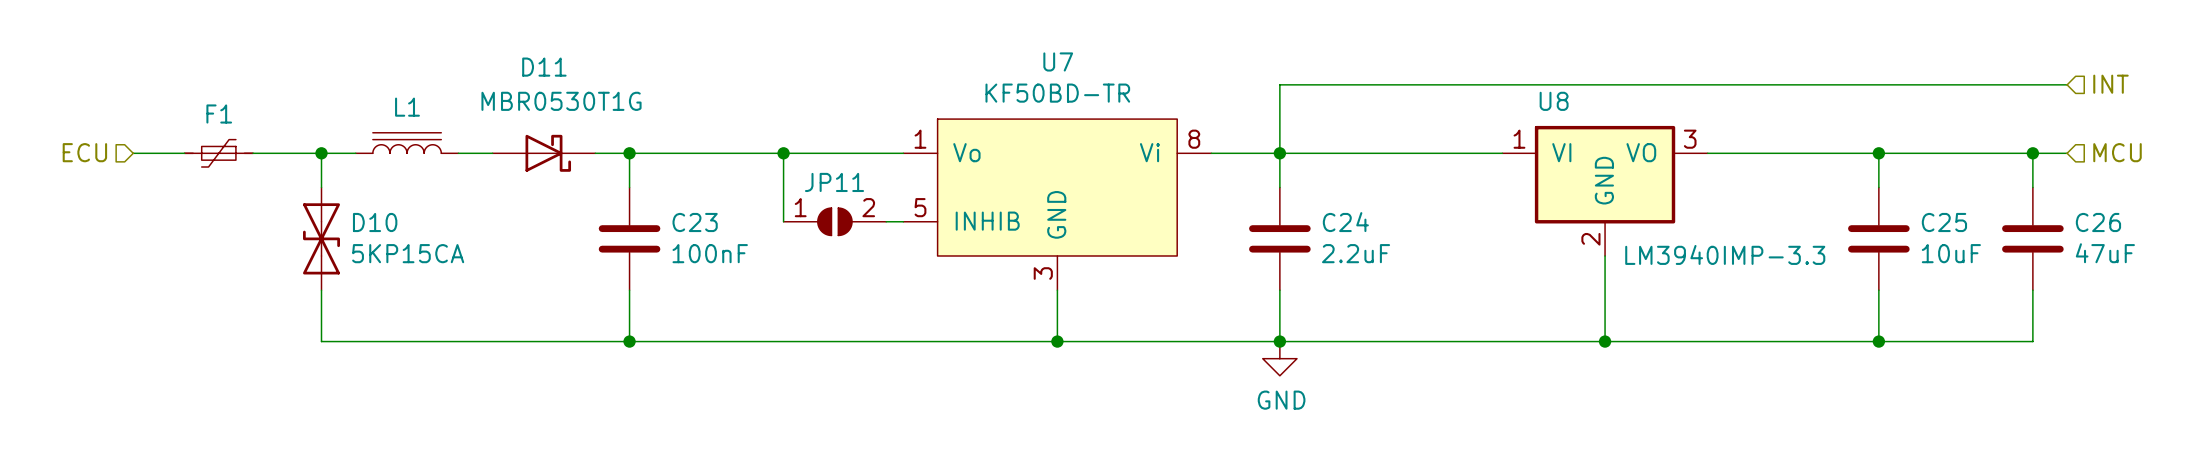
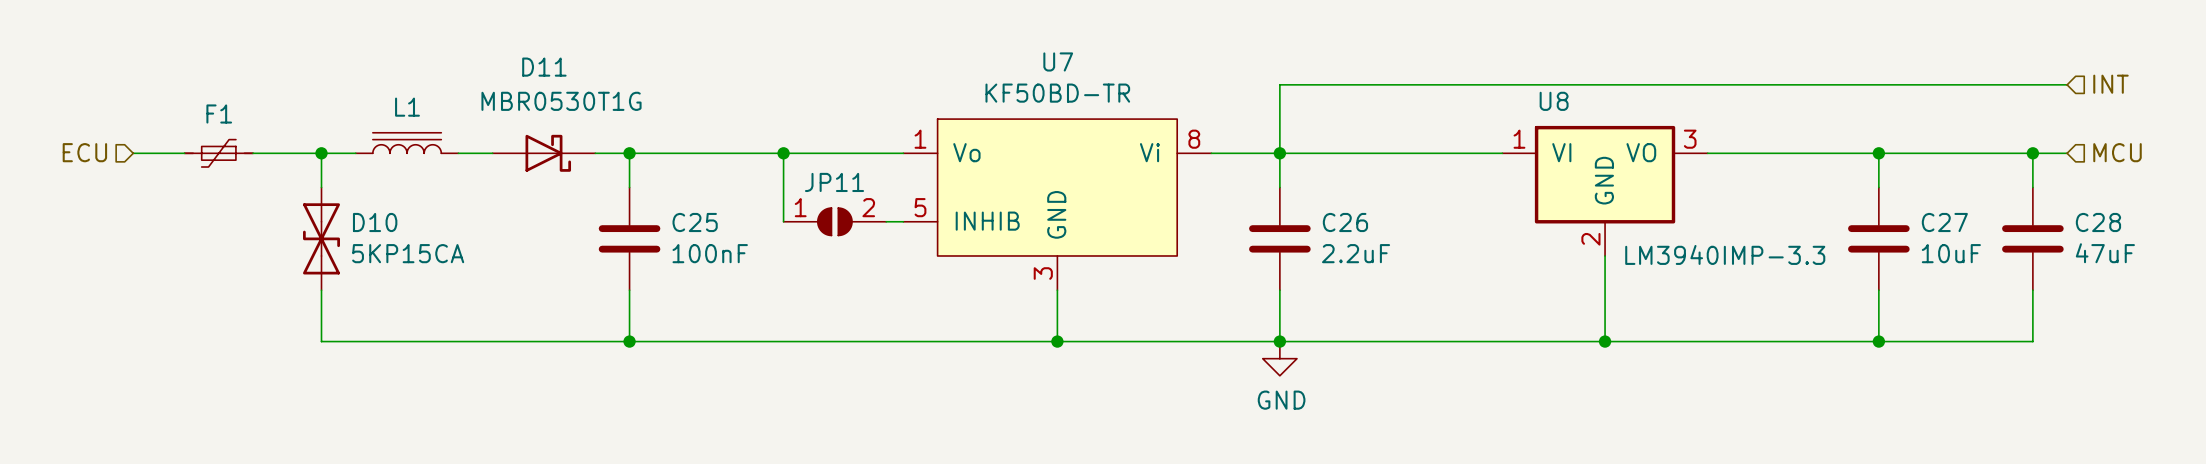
C23 name: C23 (695, 222) -> C25 (695, 222)
C24 name: C24 (1345, 222) -> C26 (1345, 222)
C25 name: C25 (1944, 222) -> C27 (1944, 222)
C26 name: C26 (2098, 222) -> C28 (2098, 222)

